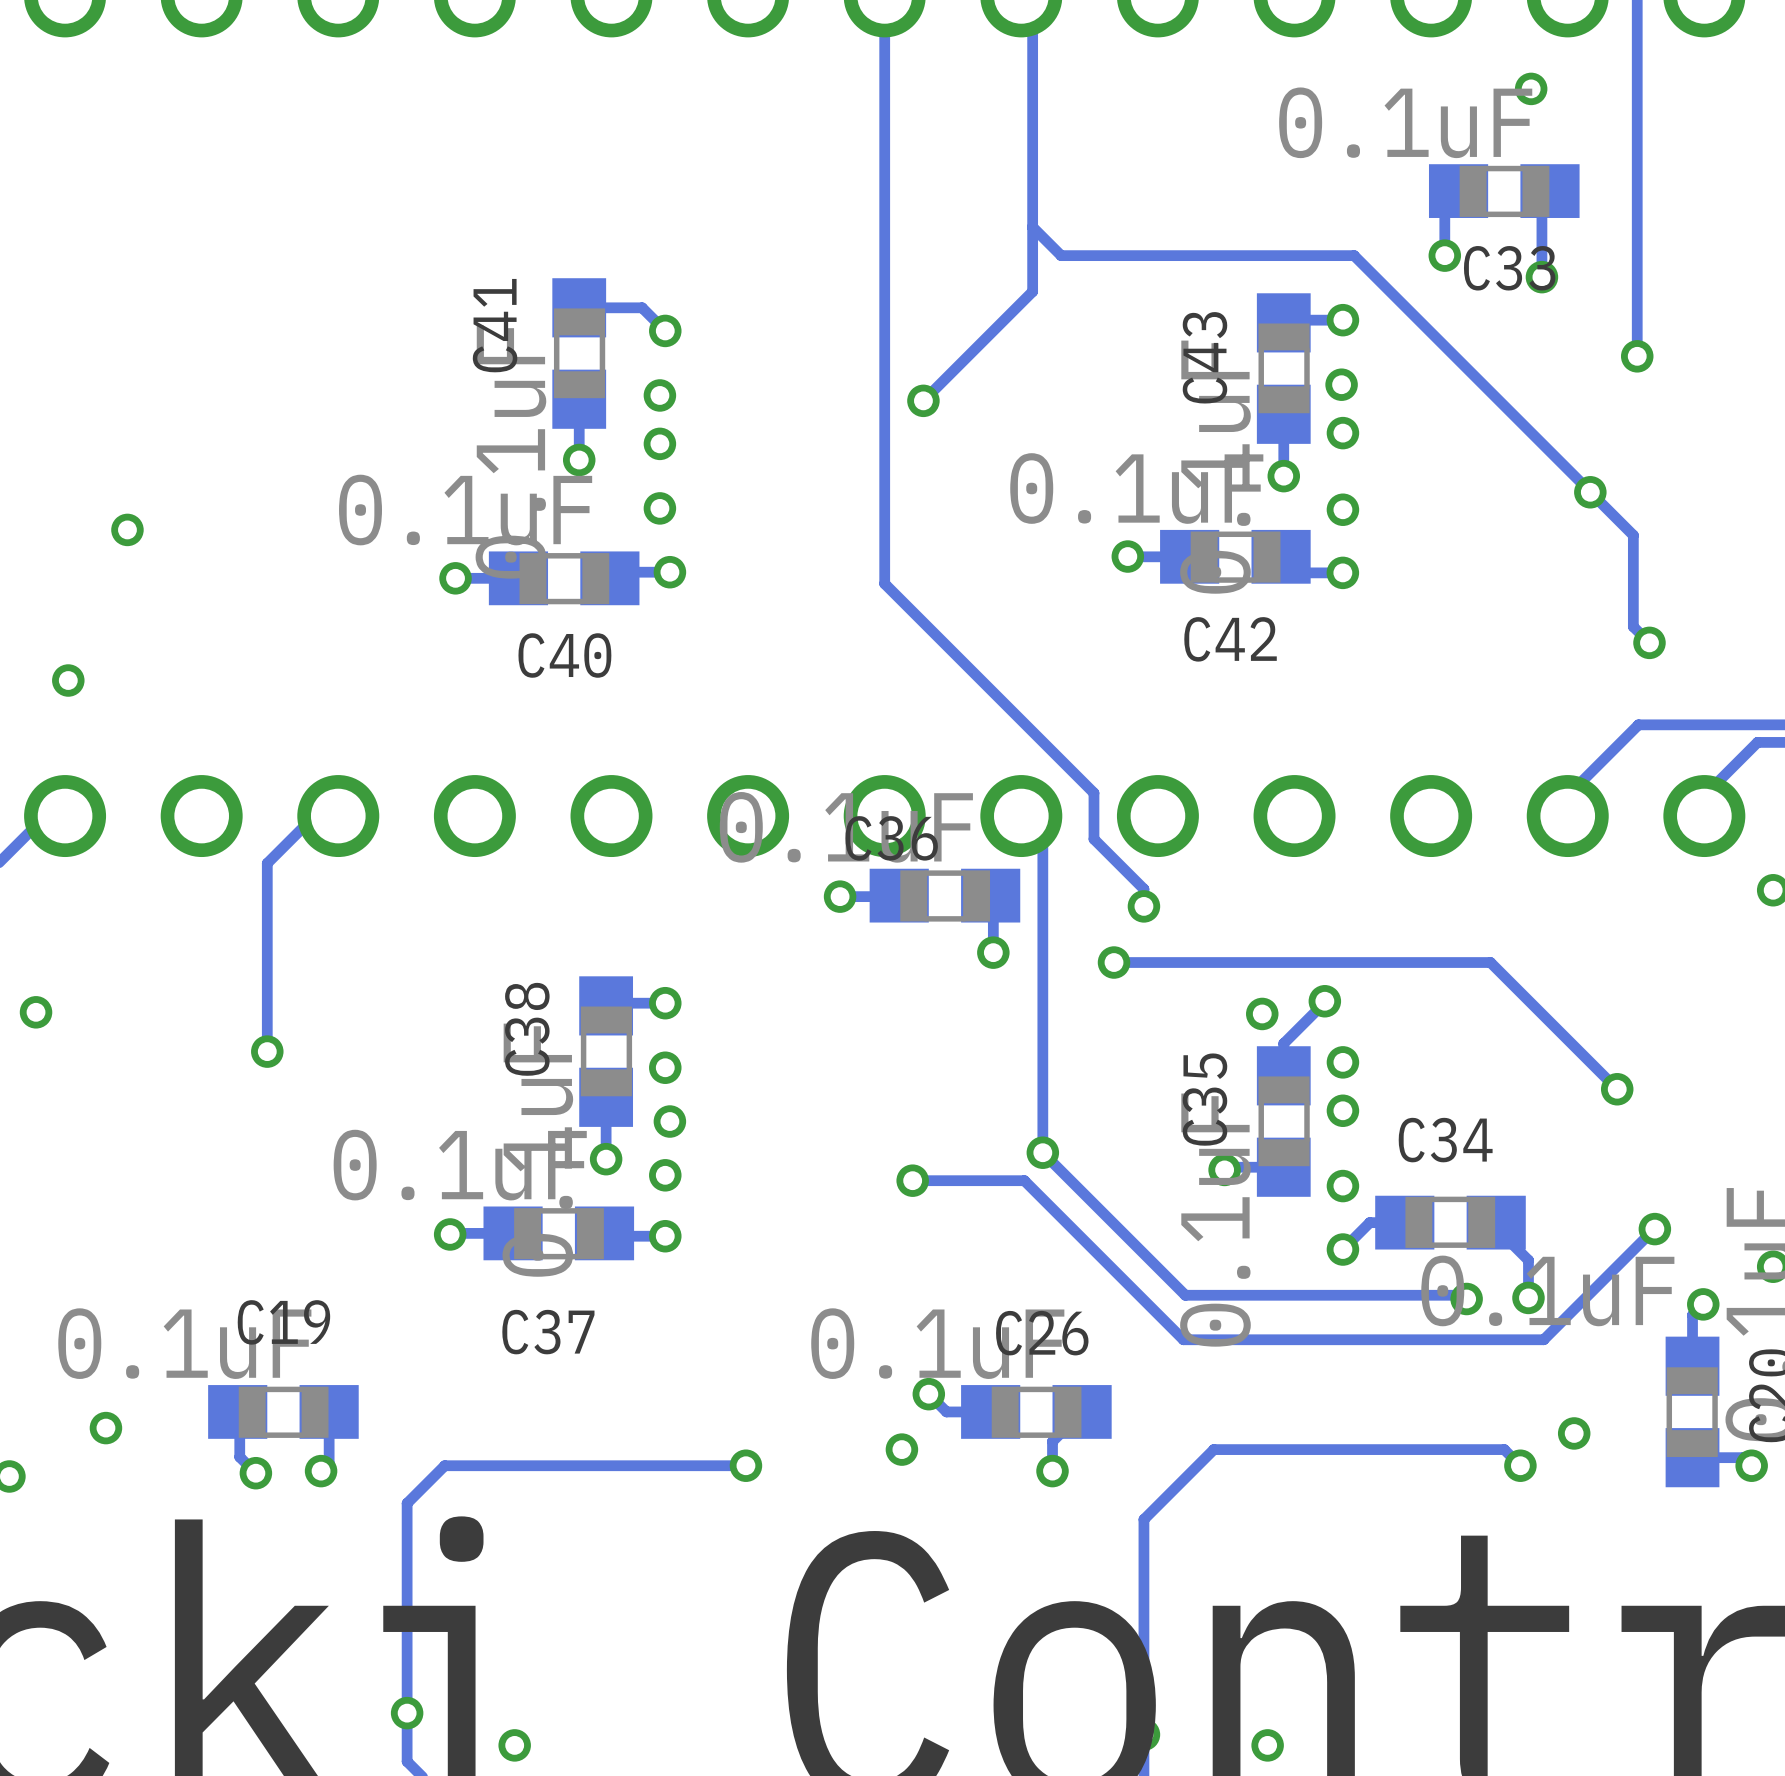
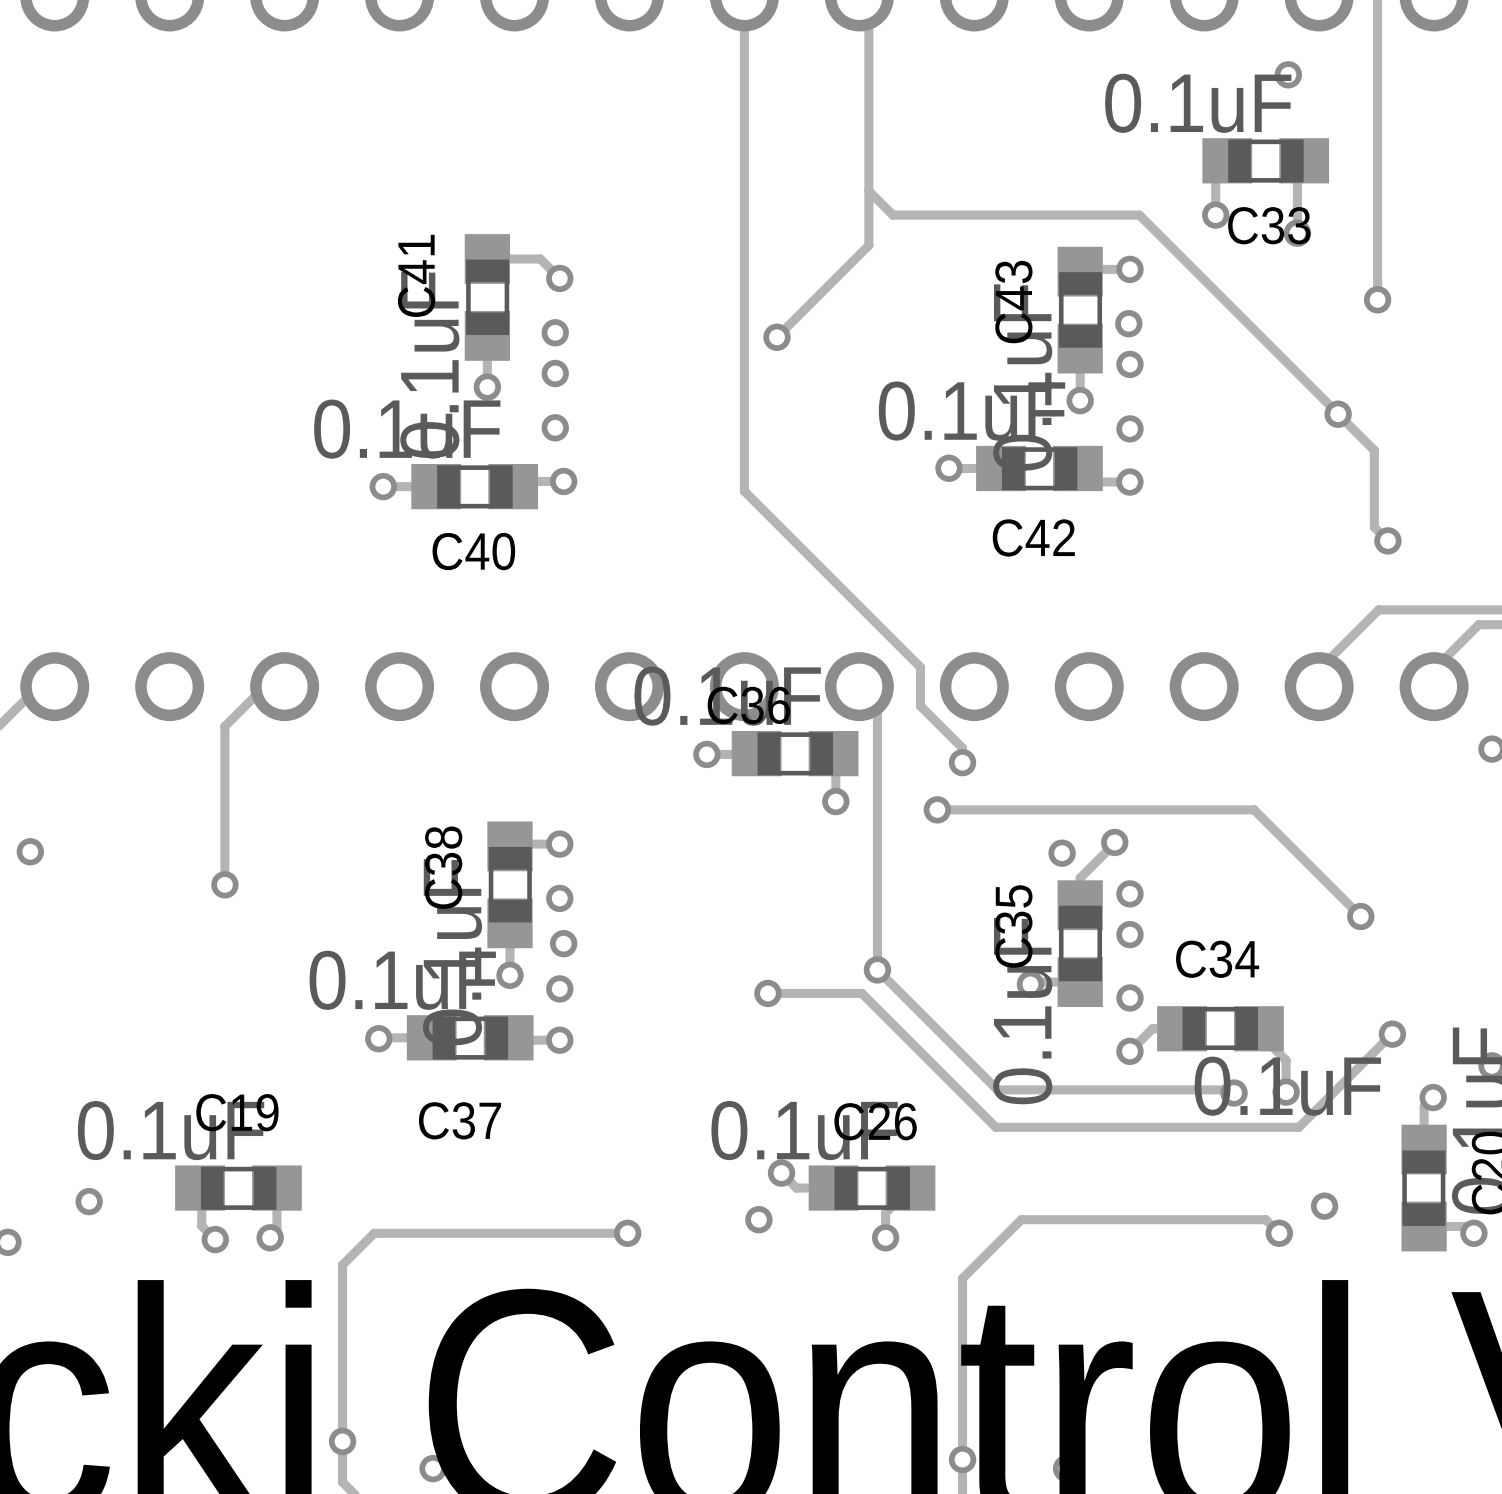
via: (127, 529) -> none
via: (68, 680) -> none

